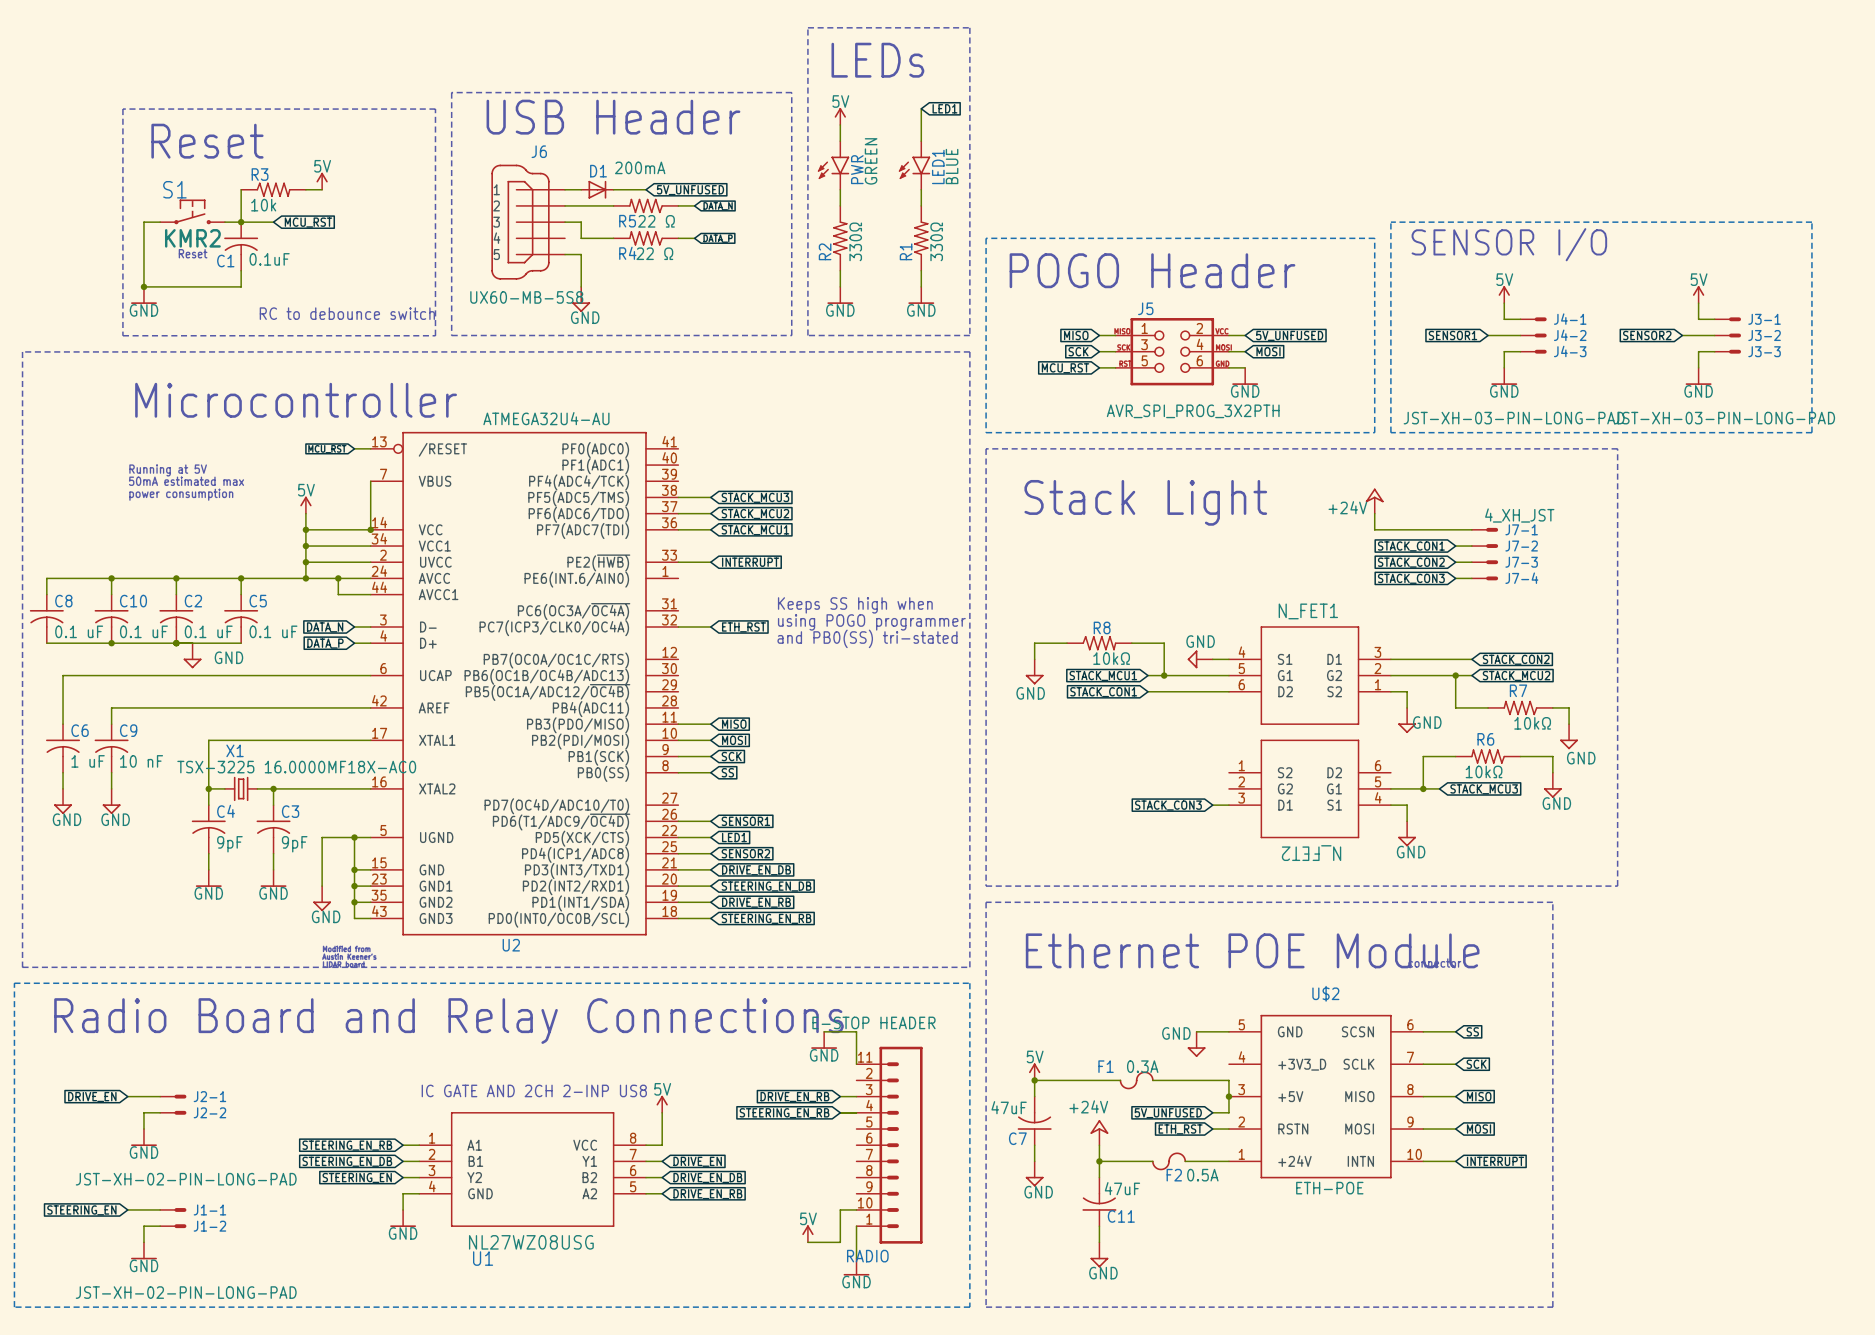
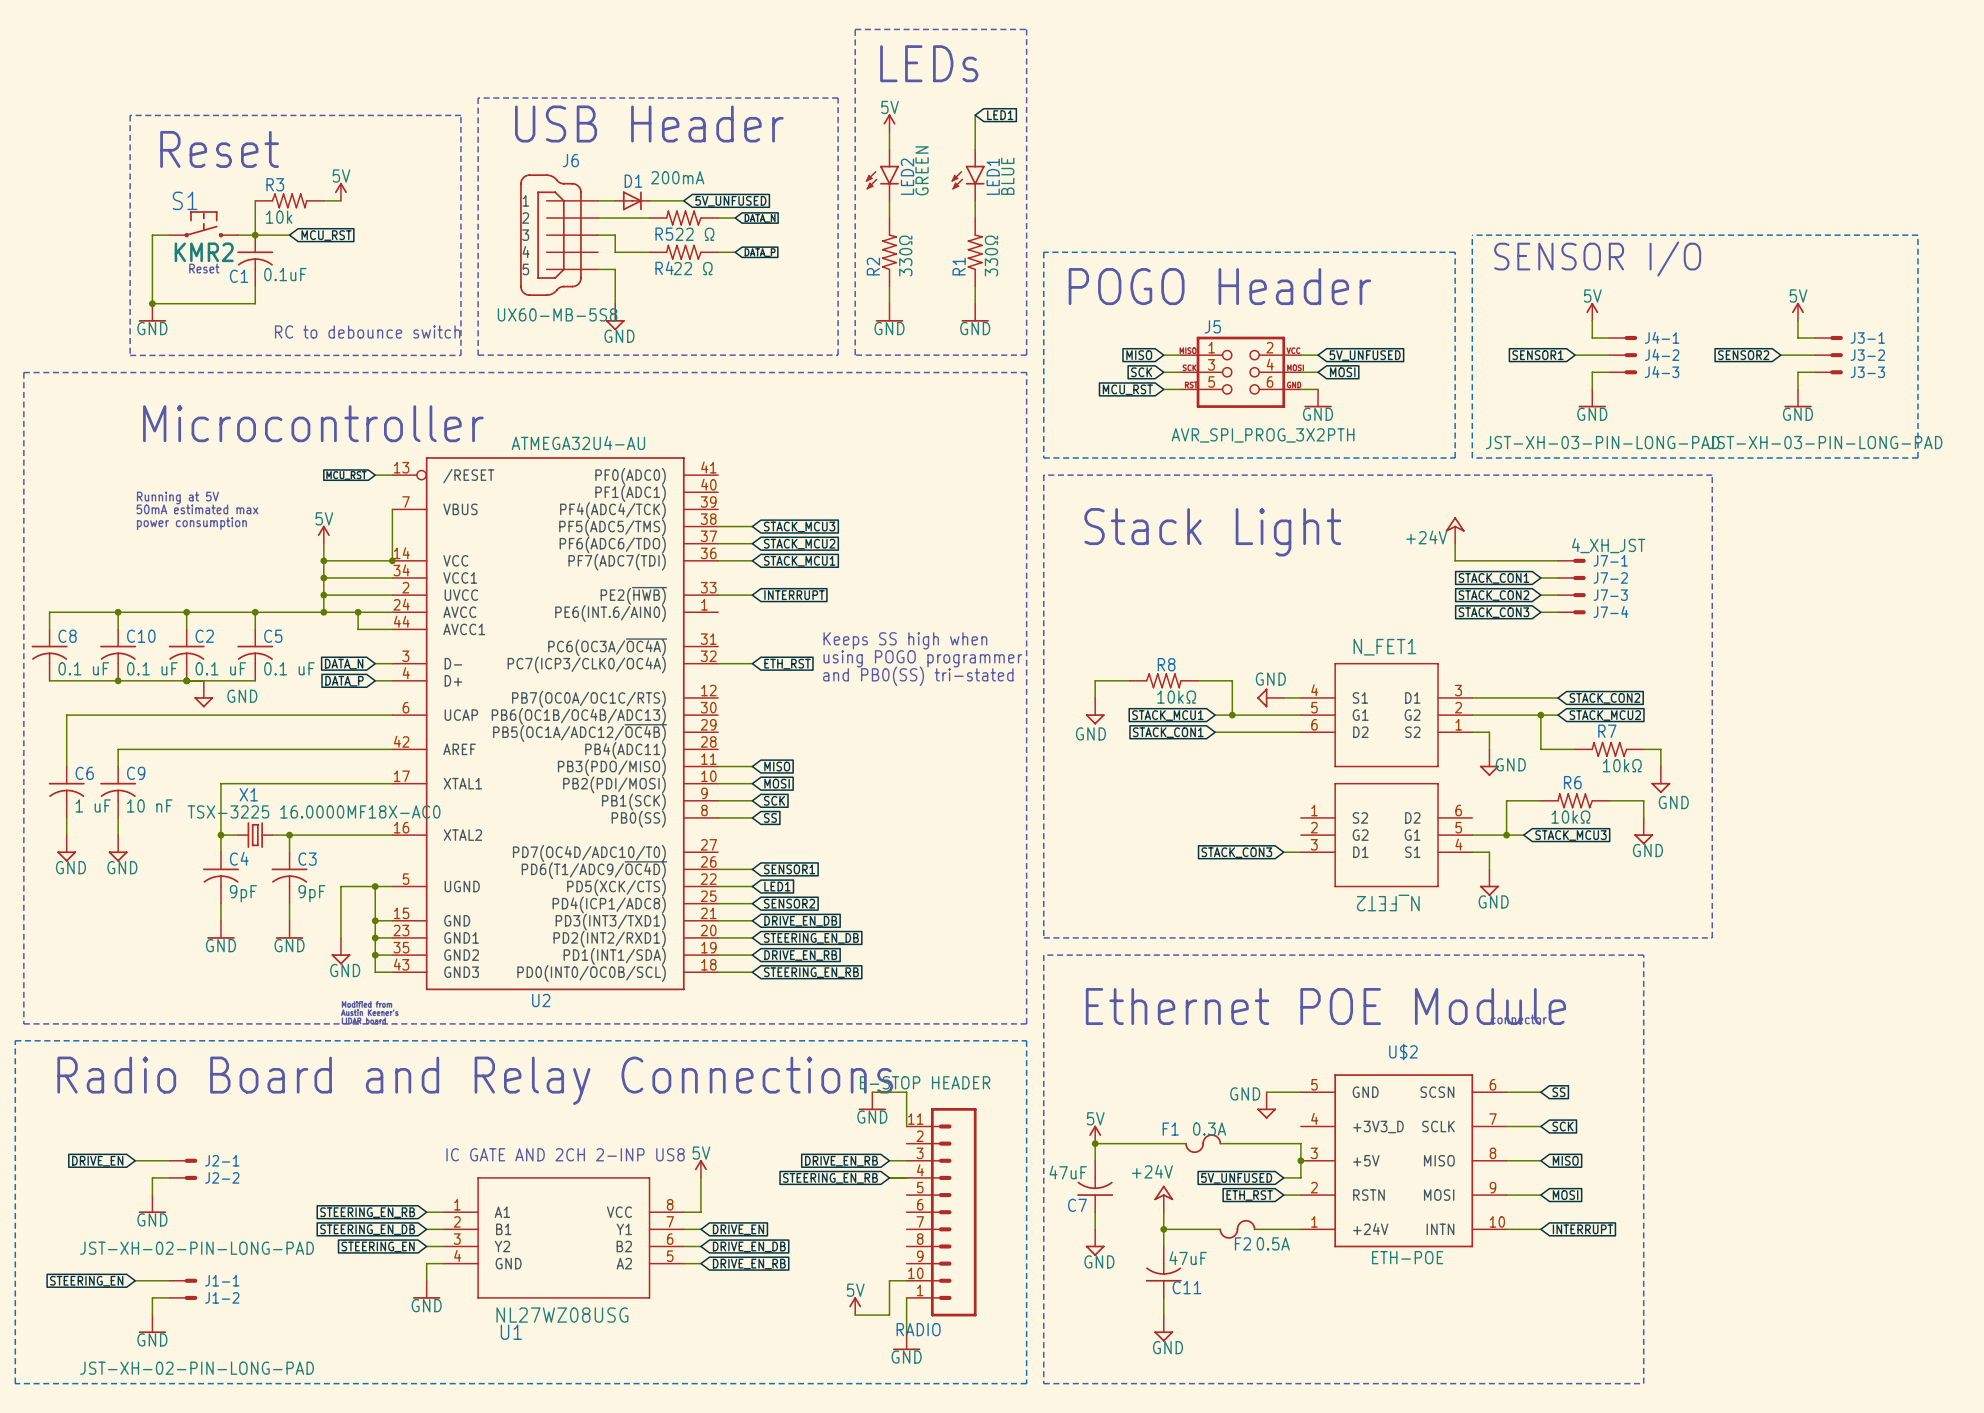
PWR name: PWR (857, 169) -> LED2 (907, 176)

